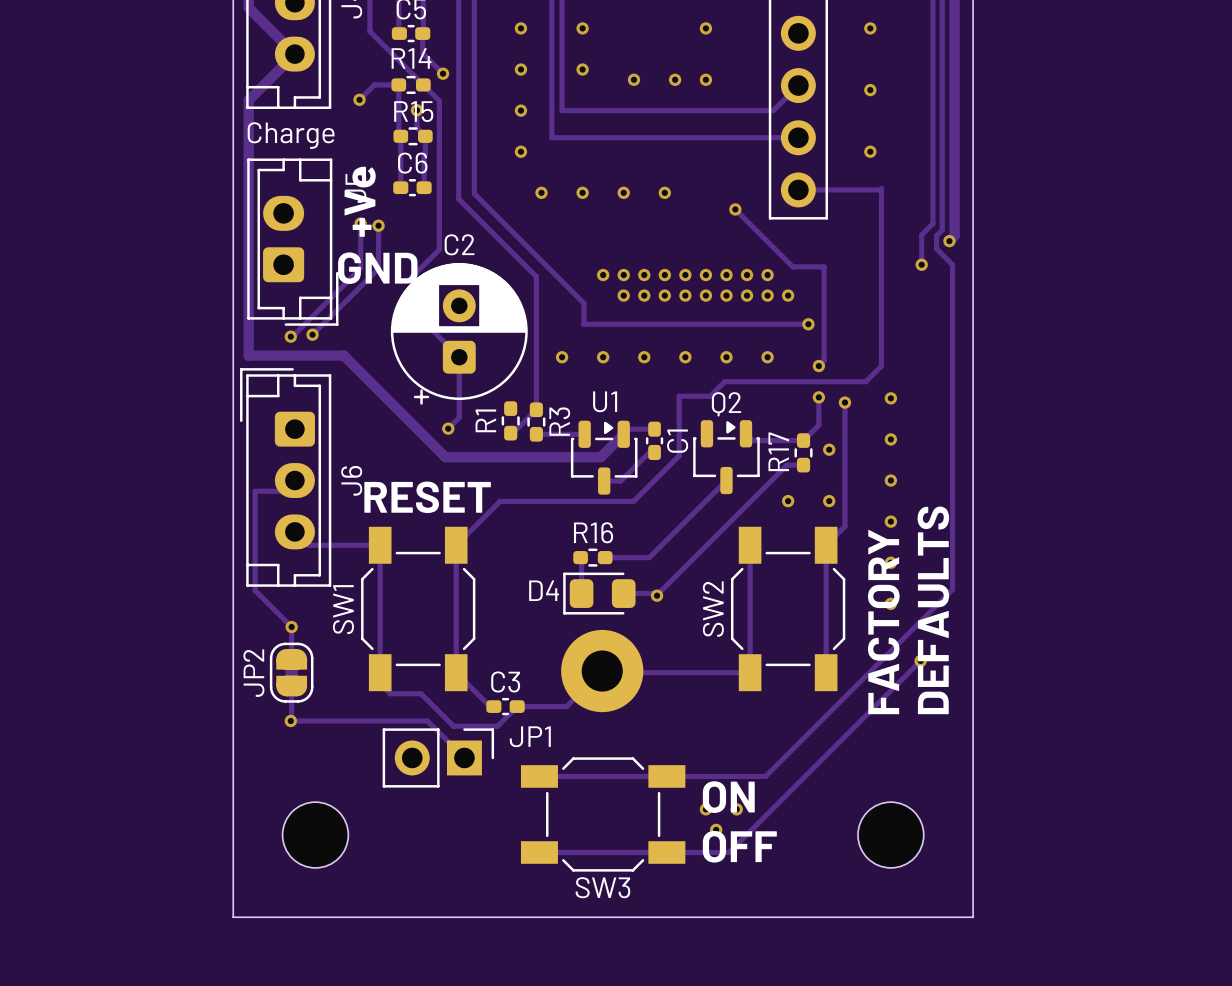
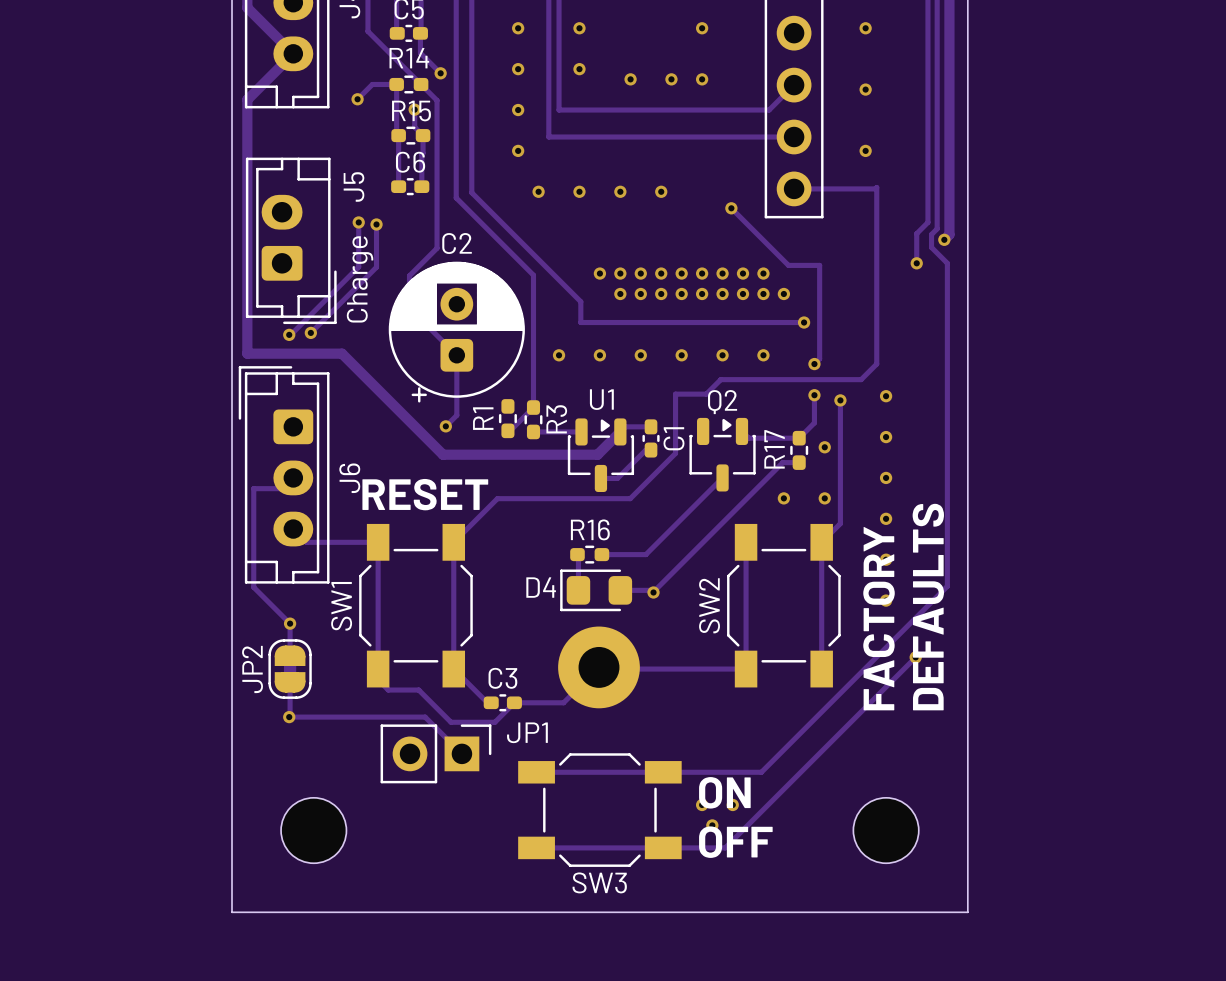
text rotation: 0° (291, 135) -> 90° counterclockwise (360, 279)
text position: Charge (291, 135) -> Charge (360, 279)
text: +Ve (360, 201) -> none
text: GND (377, 268) -> none

